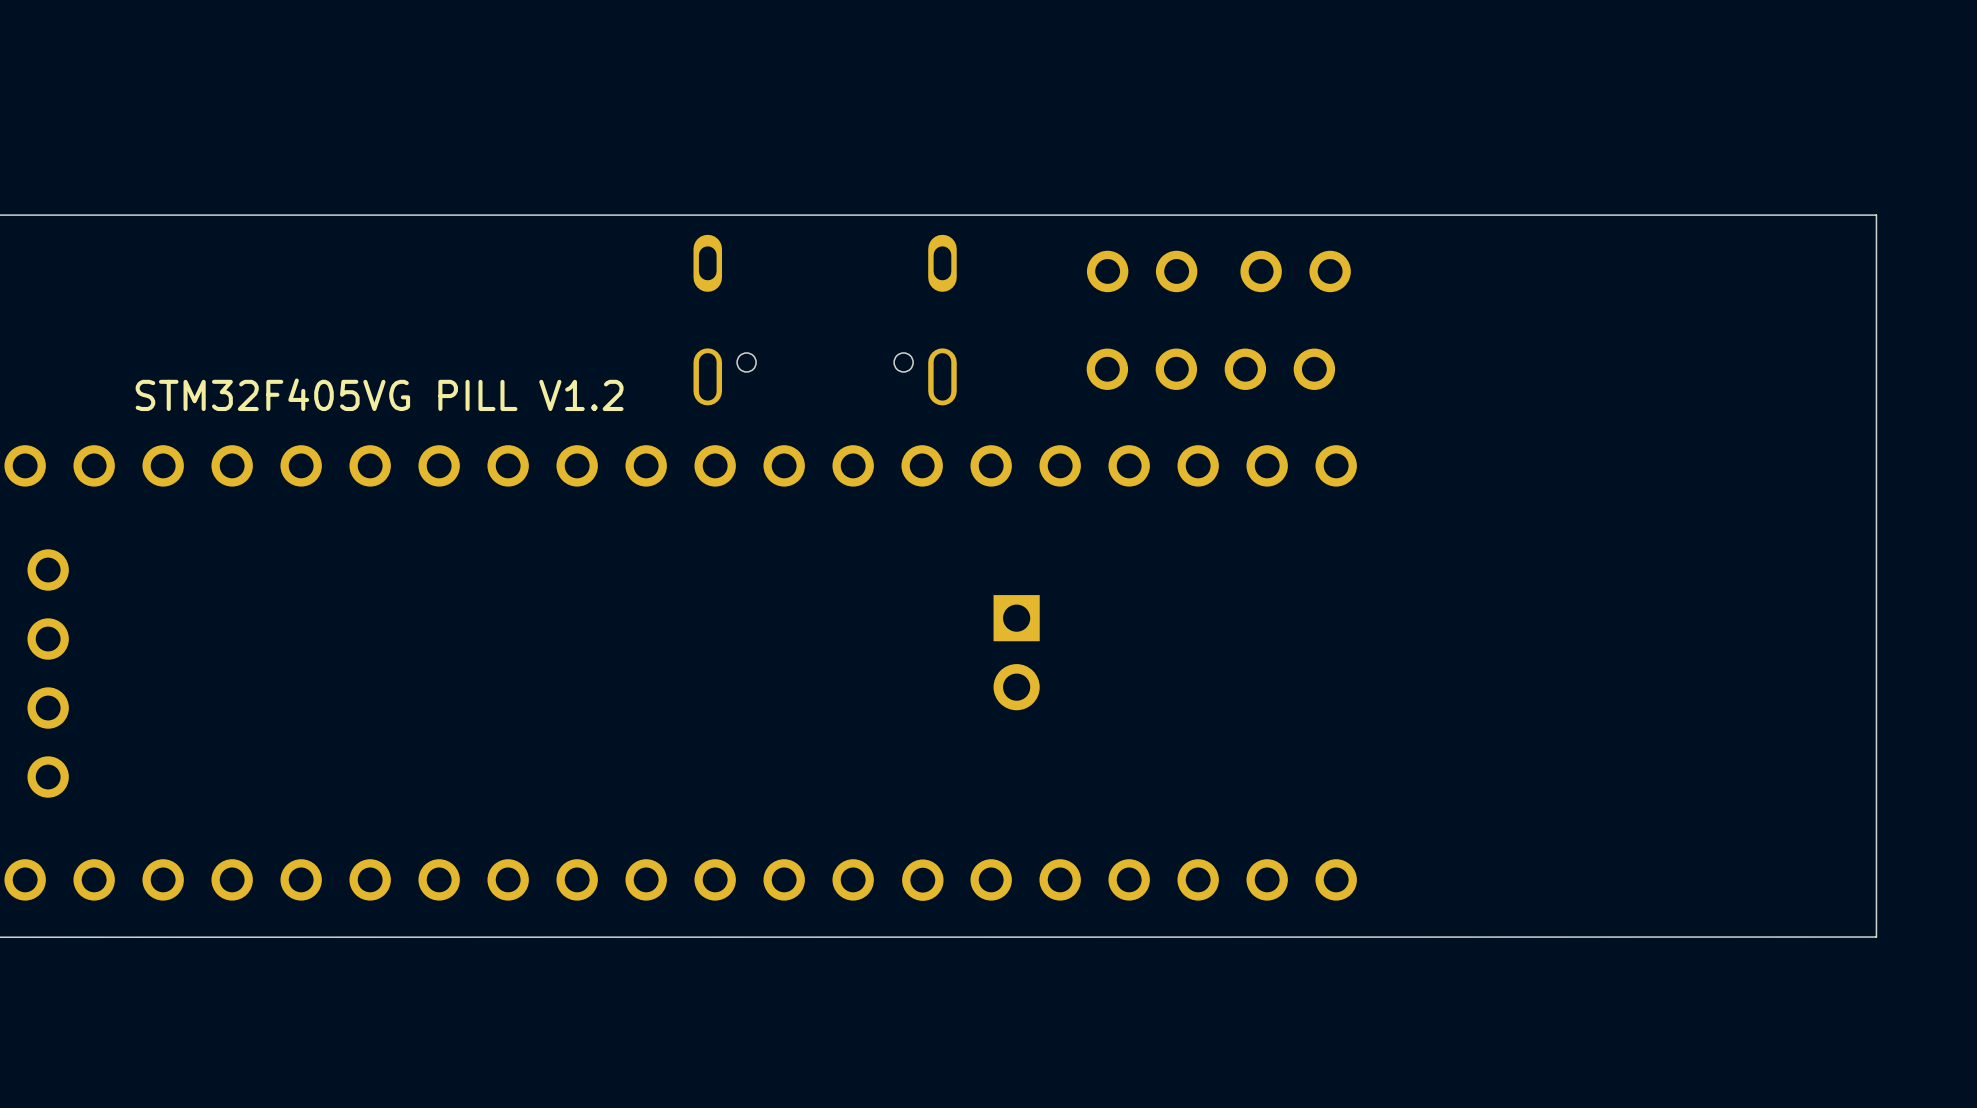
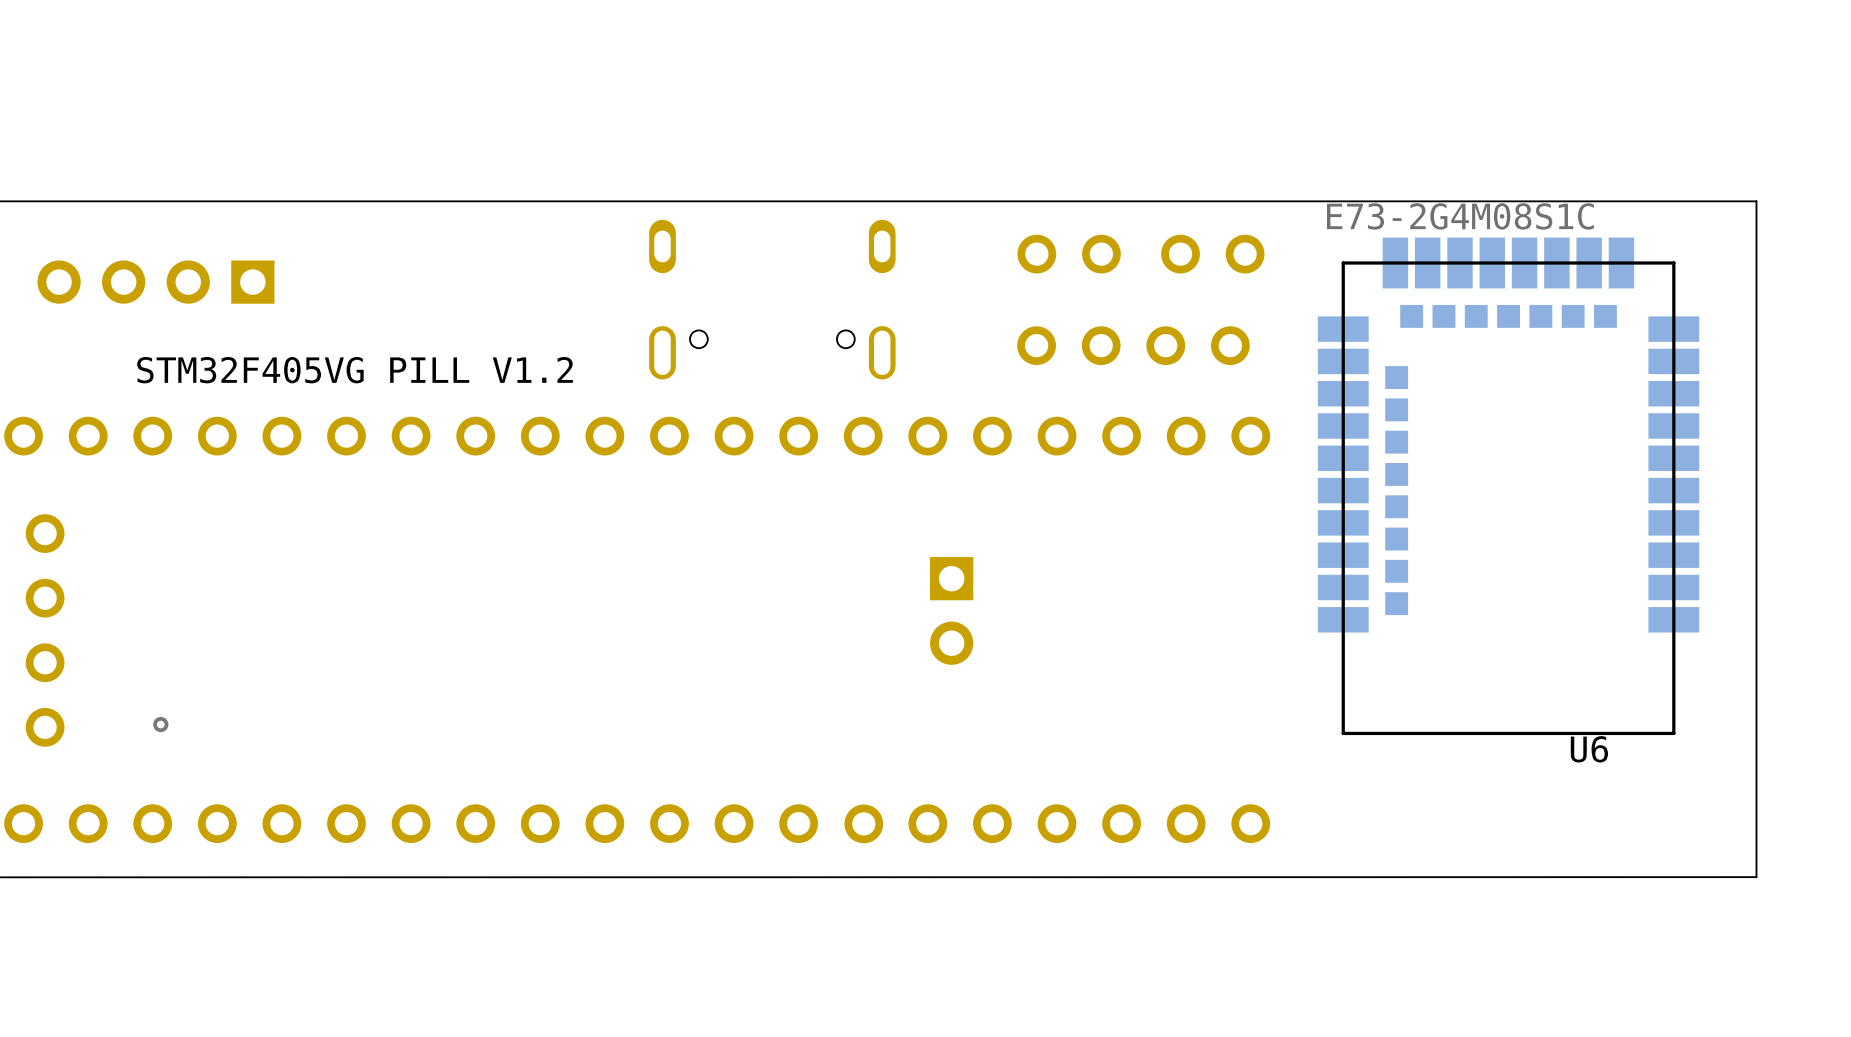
part: none -> (155, 282)
U6: none -> E73-2G4M08S1C (1508, 486)
via: none -> (160, 724)

